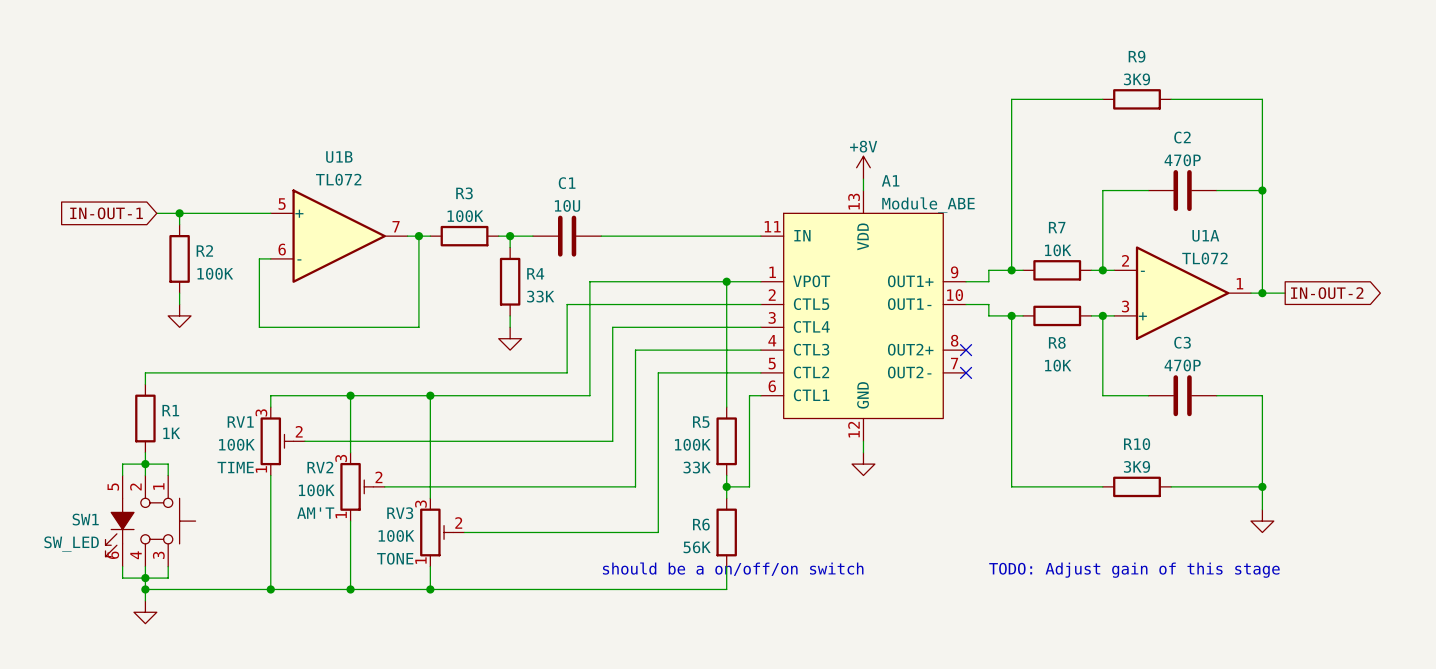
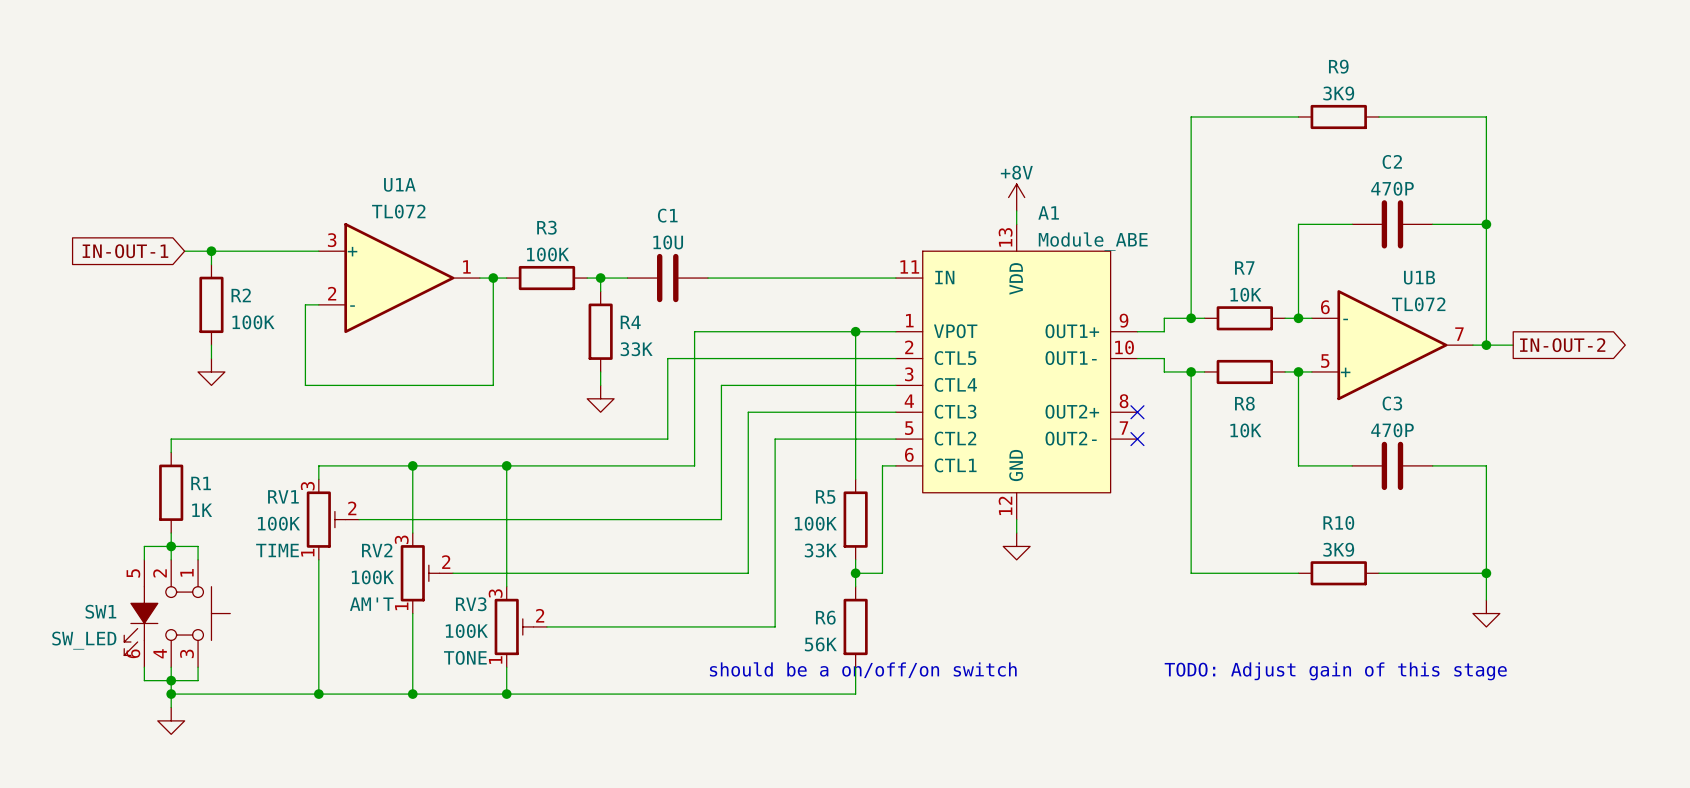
U1B name position: U1B (339, 157) -> U1B (1419, 277)
U1A name position: U1A (1205, 235) -> U1A (399, 184)
U1B flip: as is (339, 236) -> up-down (1392, 345)
U1B position: (339, 236) -> (1392, 345)
U1A flip: as is (1182, 293) -> up-down (399, 278)
U1A position: (1182, 293) -> (399, 278)

